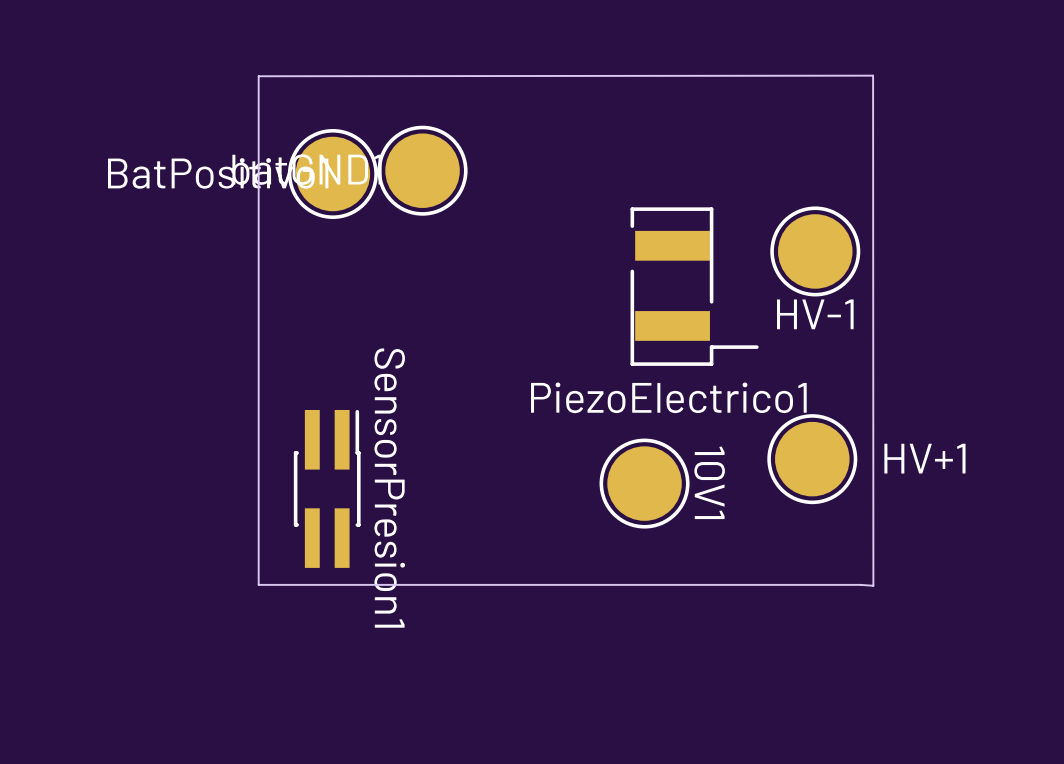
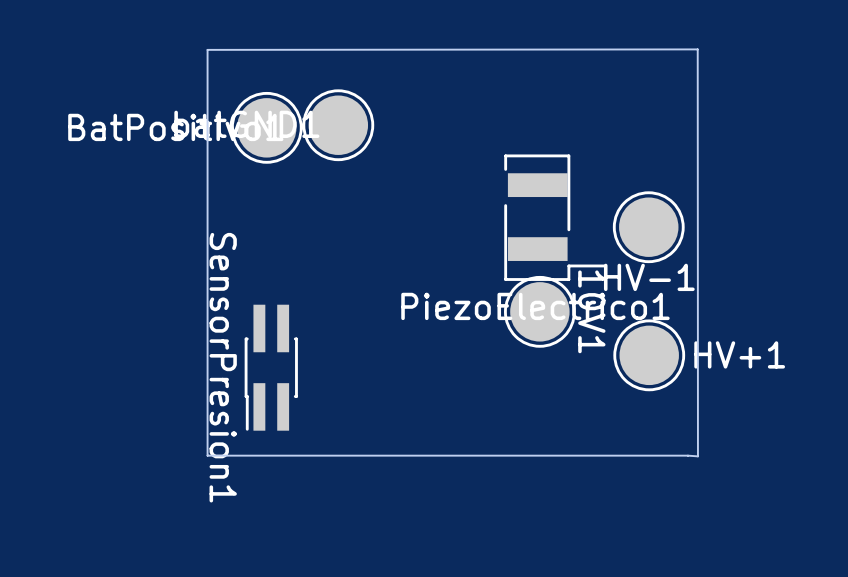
HV-1 position: (815, 251) -> (648, 227)
10V1 position: (644, 483) -> (539, 311)
SensorPresion1 rotation: 0° (327, 488) -> 180° (271, 367)

